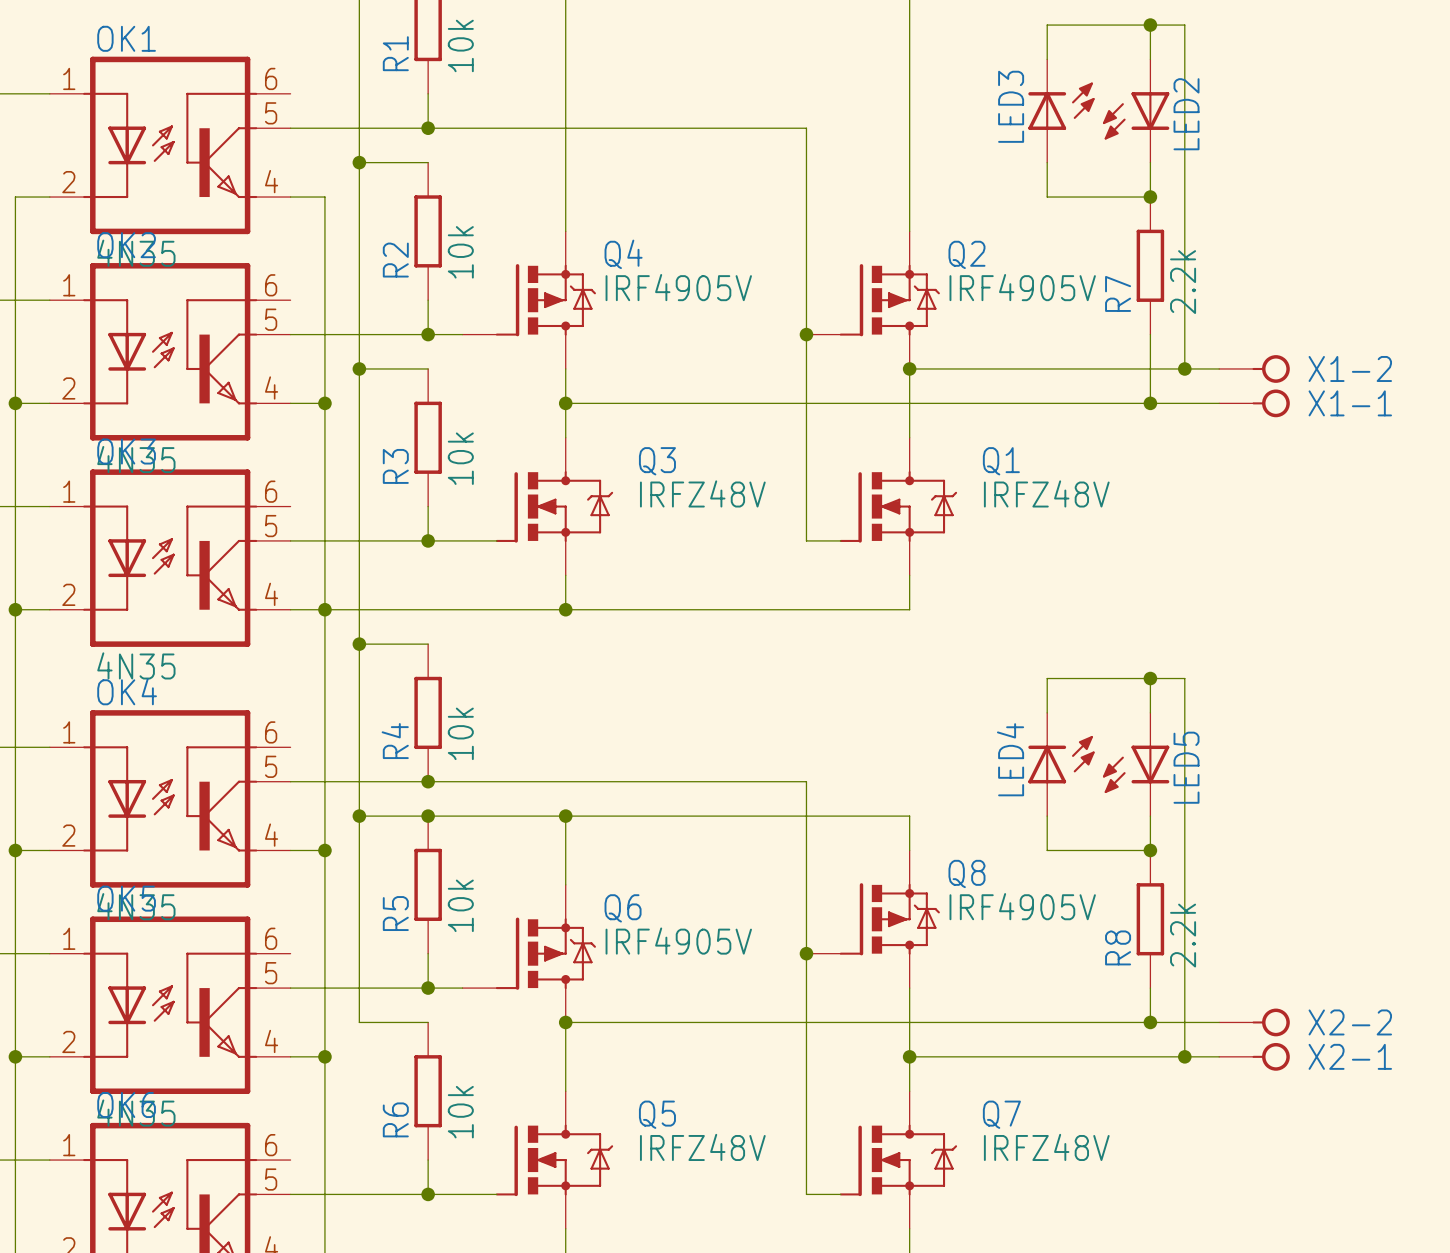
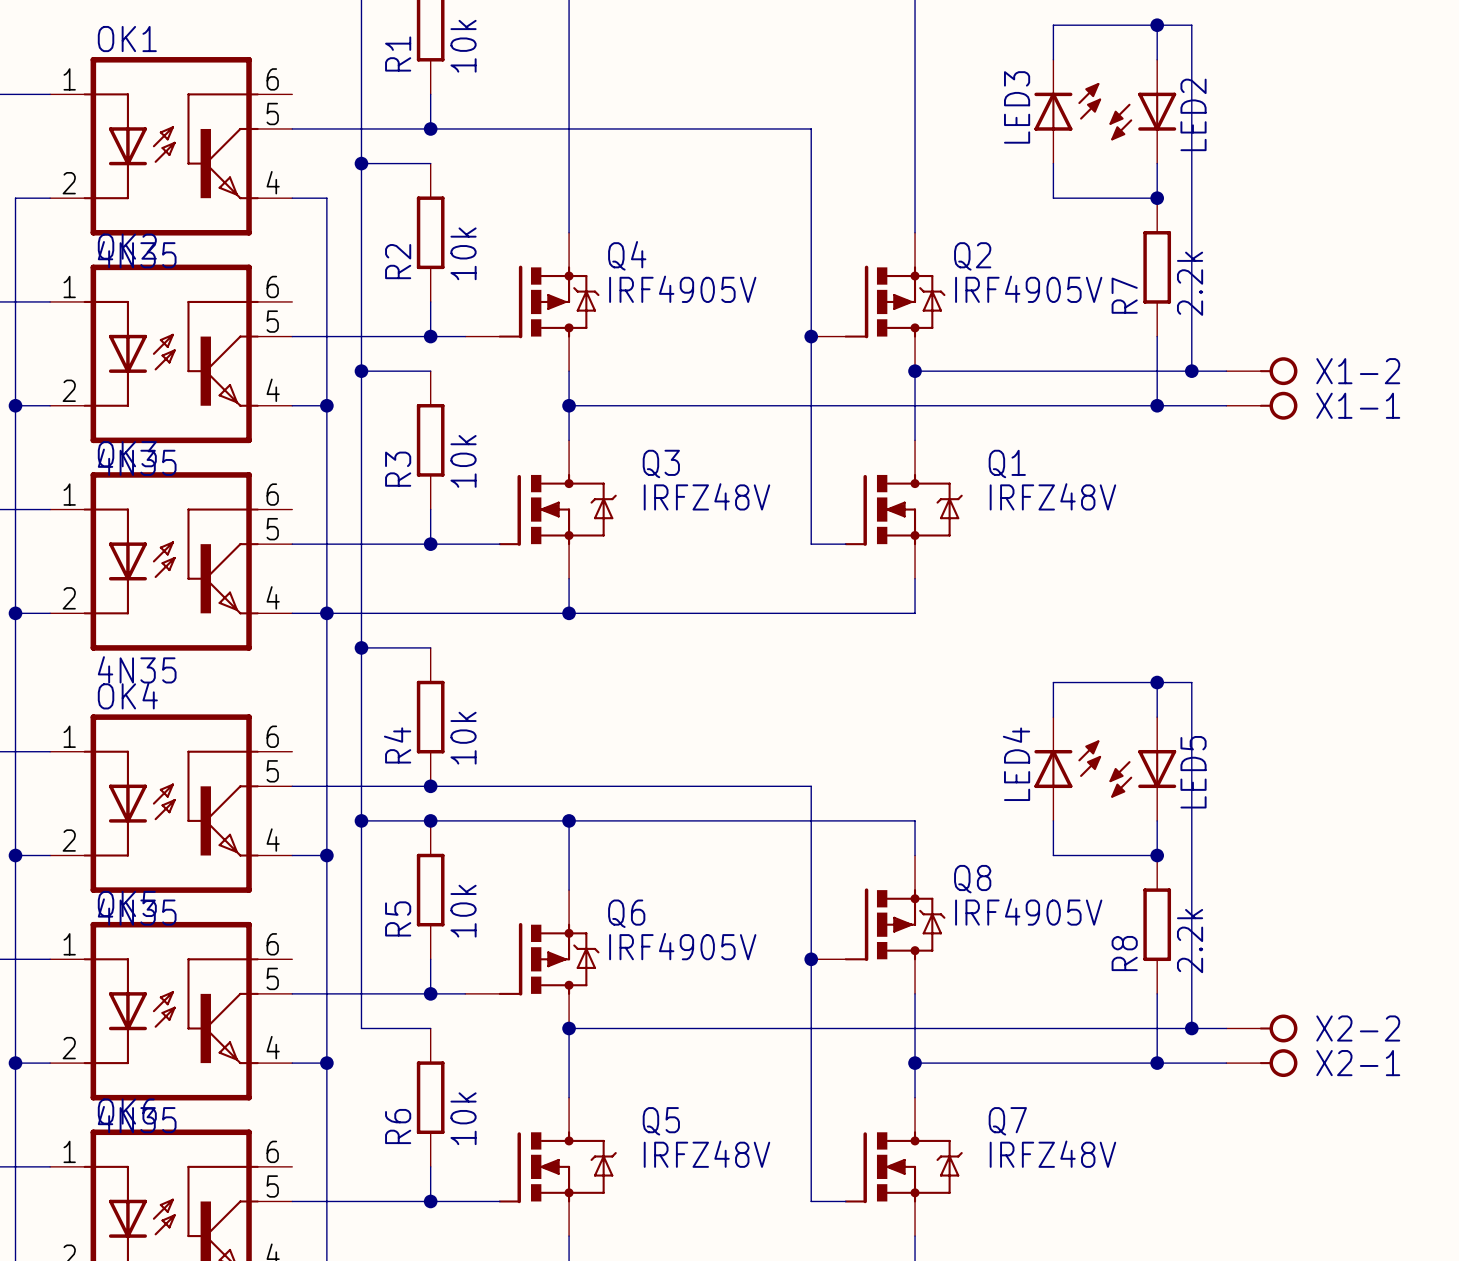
junction: (1150, 1022) -> none
wire: (1184, 1022) (1184, 1056) -> (1157, 1028) (1157, 1063)
junction: none -> (1191, 1028)
junction: none -> (1157, 1063)
junction: (1184, 1056) -> none

